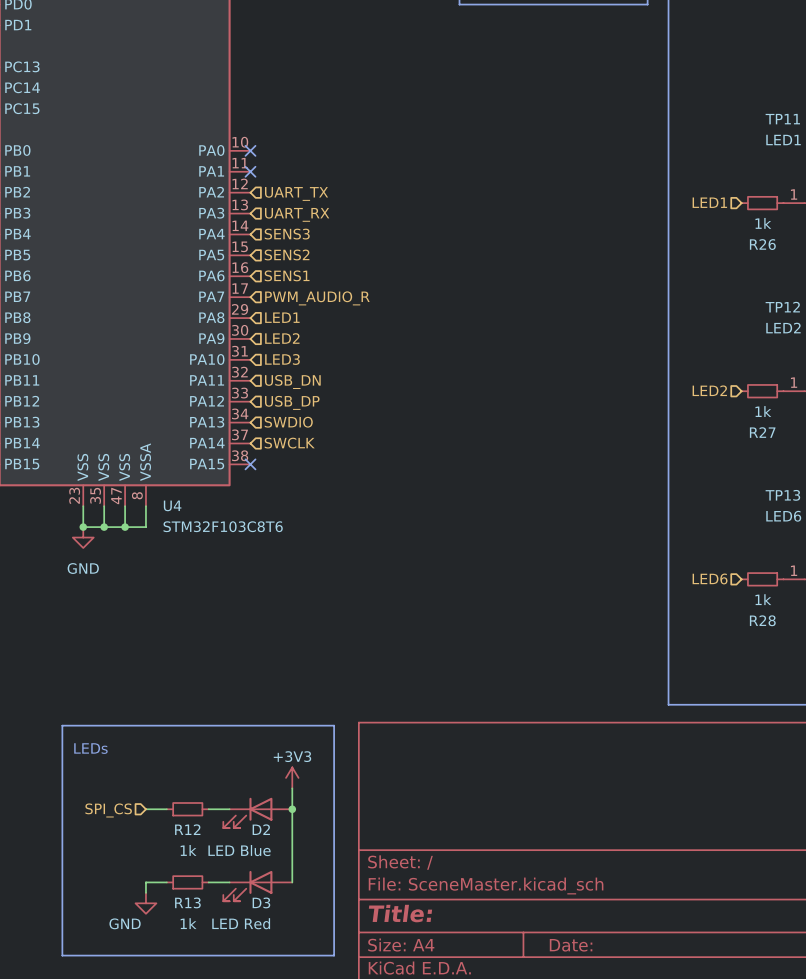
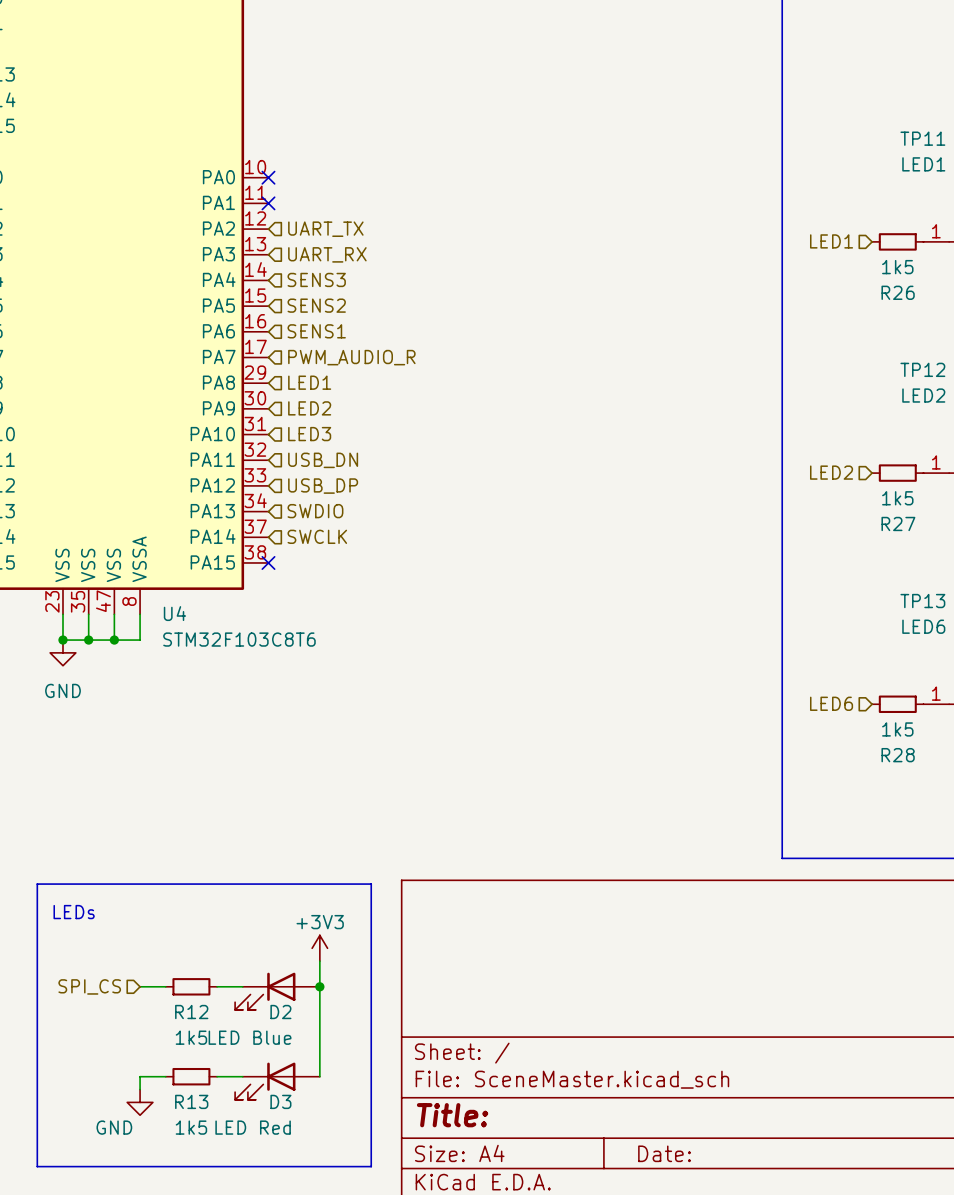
R26 value: 1k (763, 223) -> 1k5 (897, 267)
R27 value: 1k (763, 411) -> 1k5 (897, 498)
R28 value: 1k (763, 599) -> 1k5 (897, 729)
R12 value: 1k (188, 850) -> 1k5 (191, 1037)
R13 value: 1k (188, 923) -> 1k5 (191, 1127)

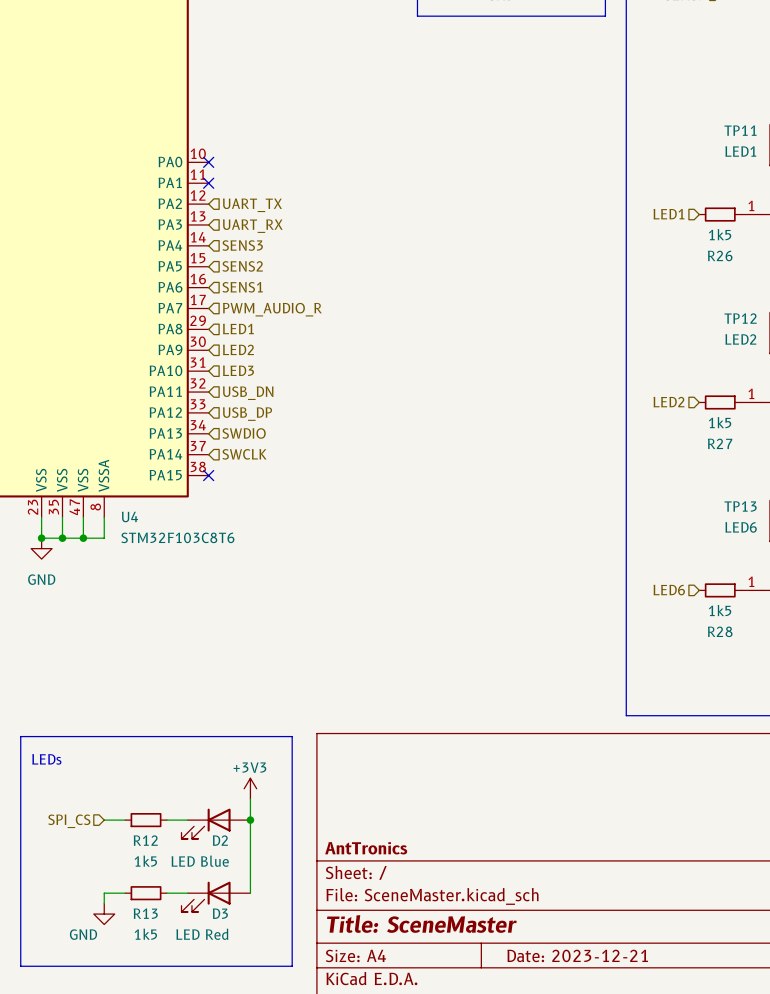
title block: none -> AntTronics (366, 848)
title block: Title: (452, 1115) -> Title: SceneMaster (421, 923)
title block: Date: (664, 1153) -> Date: 2023-12-21 (577, 955)

